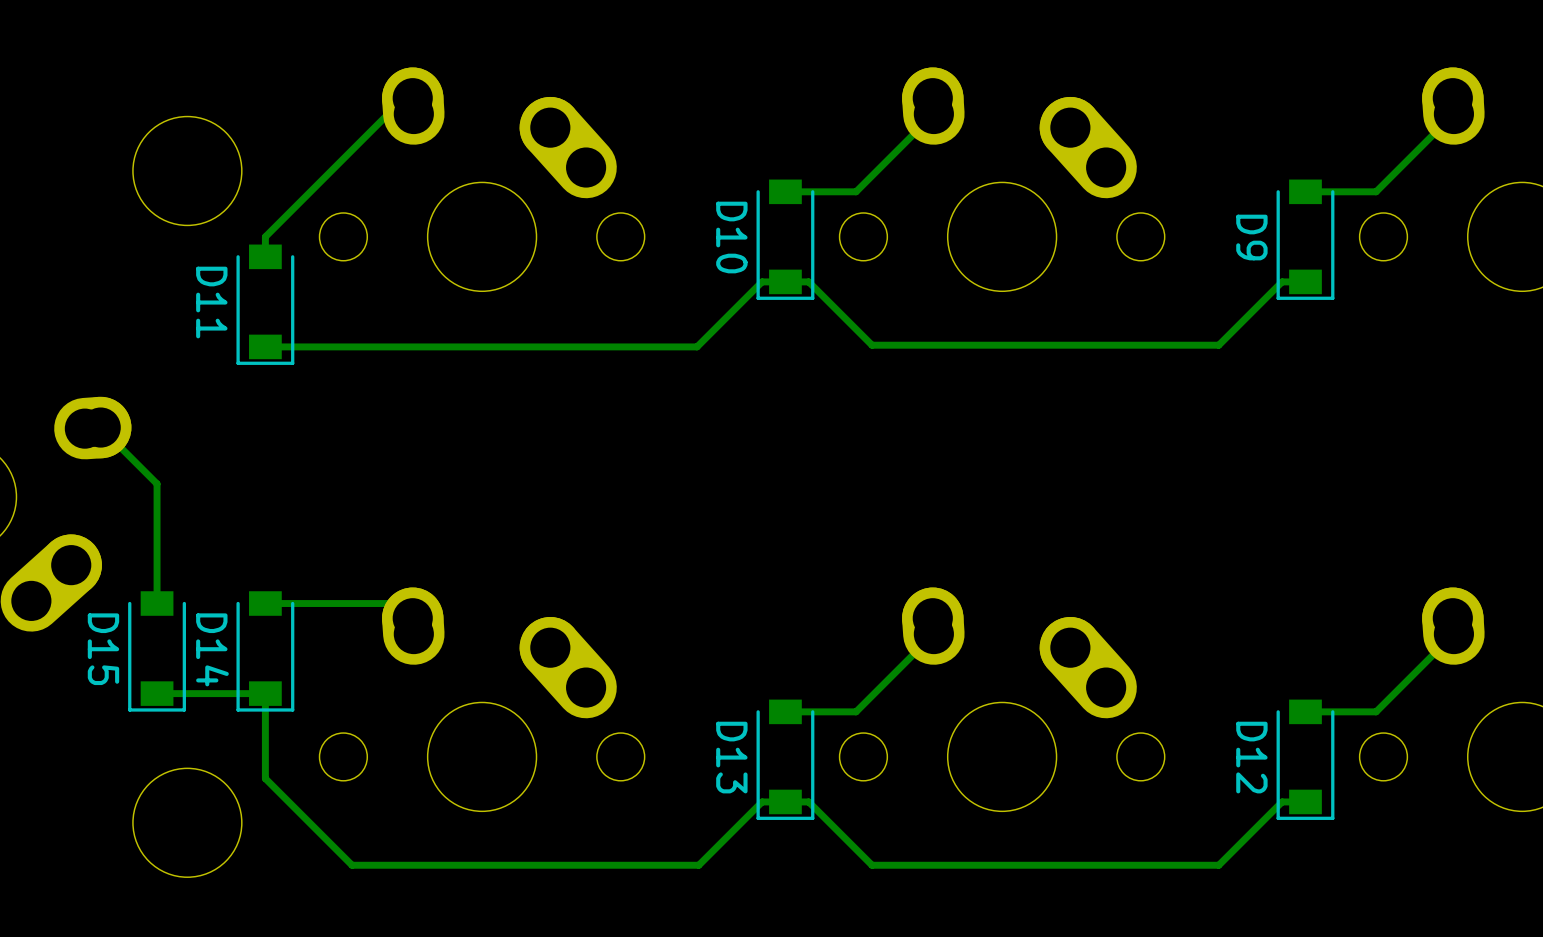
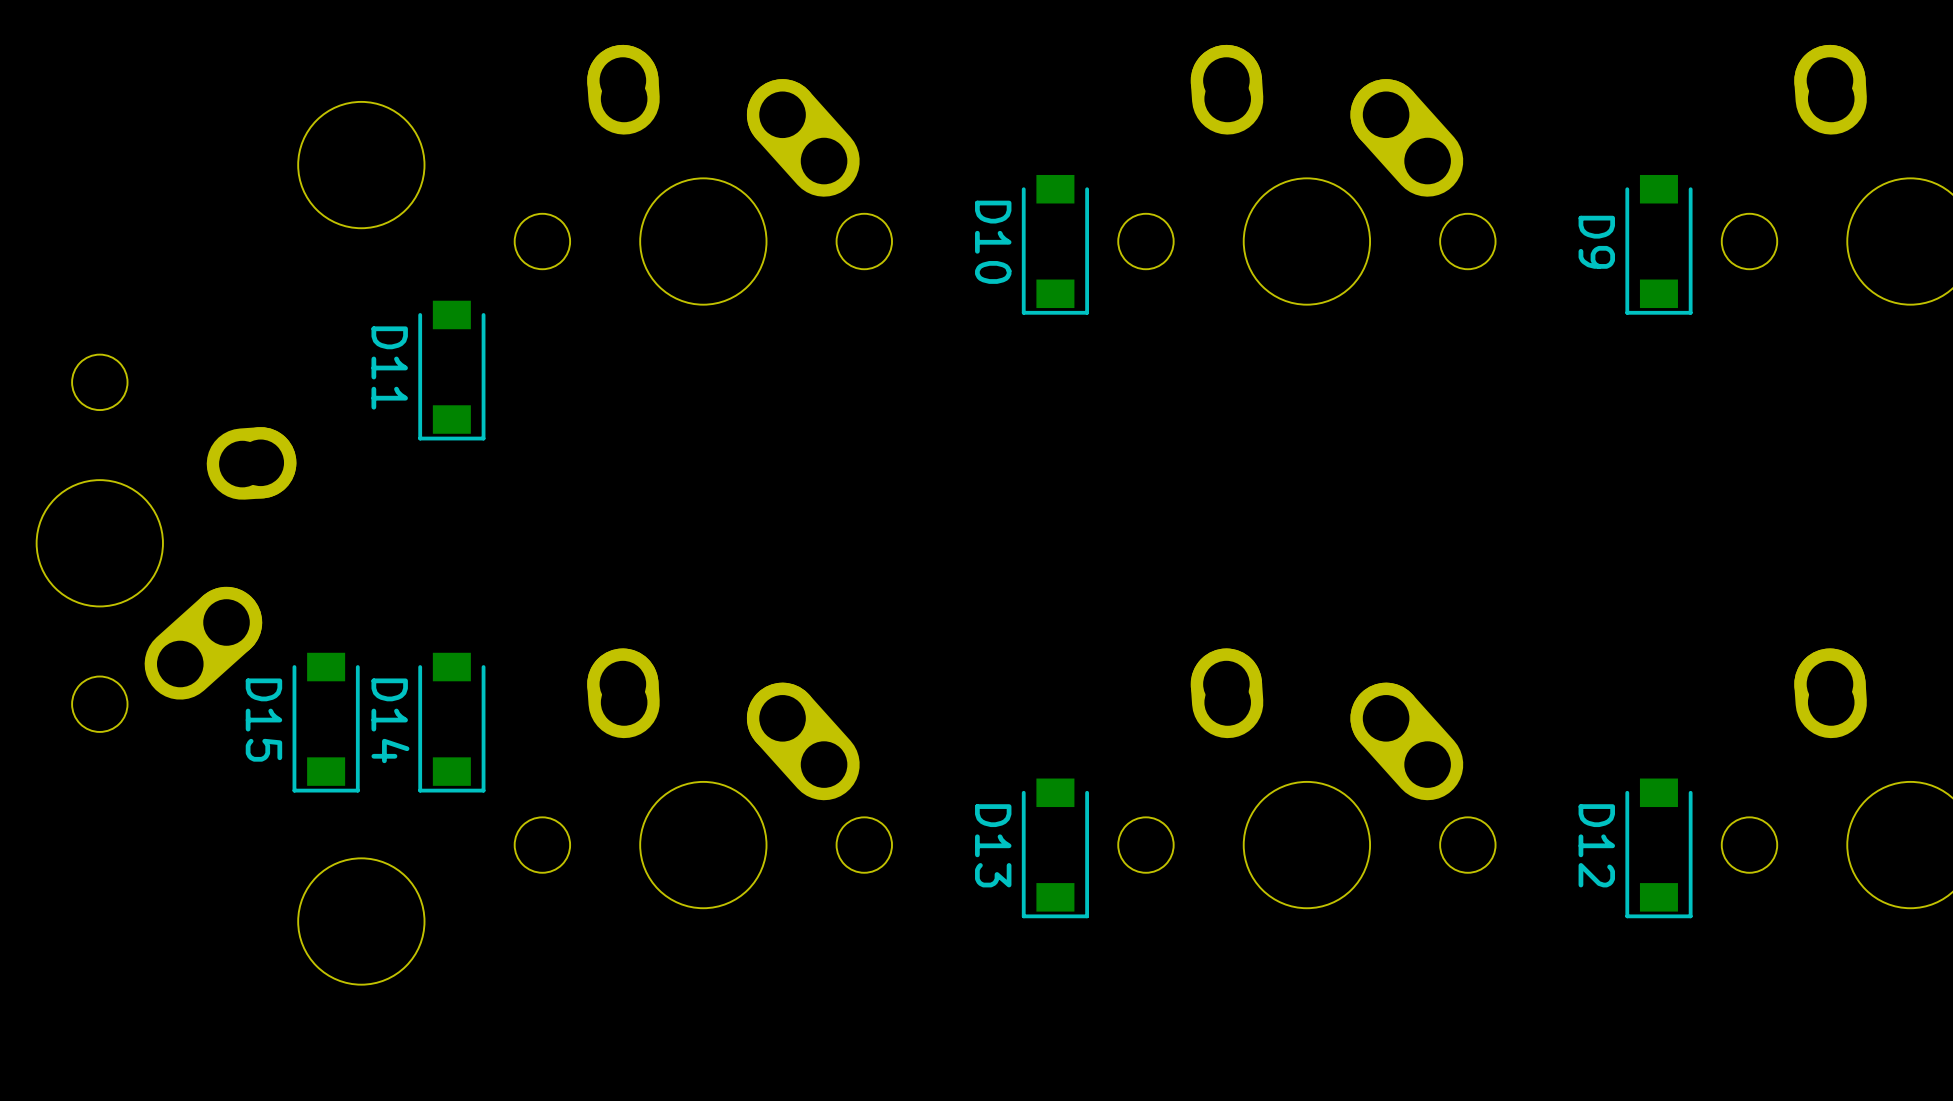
track: (413, 114) (388, 114) (265, 236) (265, 256) -> none
track: (933, 114) (856, 191) (785, 191) -> none
track: (1453, 114) (1376, 191) (1305, 191) -> none
track: (1305, 281) (1282, 281) (1218, 345) (872, 345) (808, 281) (762, 281) (697, 346) (265, 346) -> none
D11 position: (265, 304) -> (451, 370)
track: (100, 427) (157, 483) (157, 603) -> none
track: (265, 603) (398, 603) (412, 618) -> none
track: (933, 634) (856, 711) (785, 711) -> none
track: (1453, 634) (1376, 711) (1305, 711) -> none
track: (157, 693) (265, 693) (265, 778) (352, 865) (698, 865) (762, 801) (808, 801) (872, 865) (1218, 865) (1282, 801) (1305, 801) -> none

